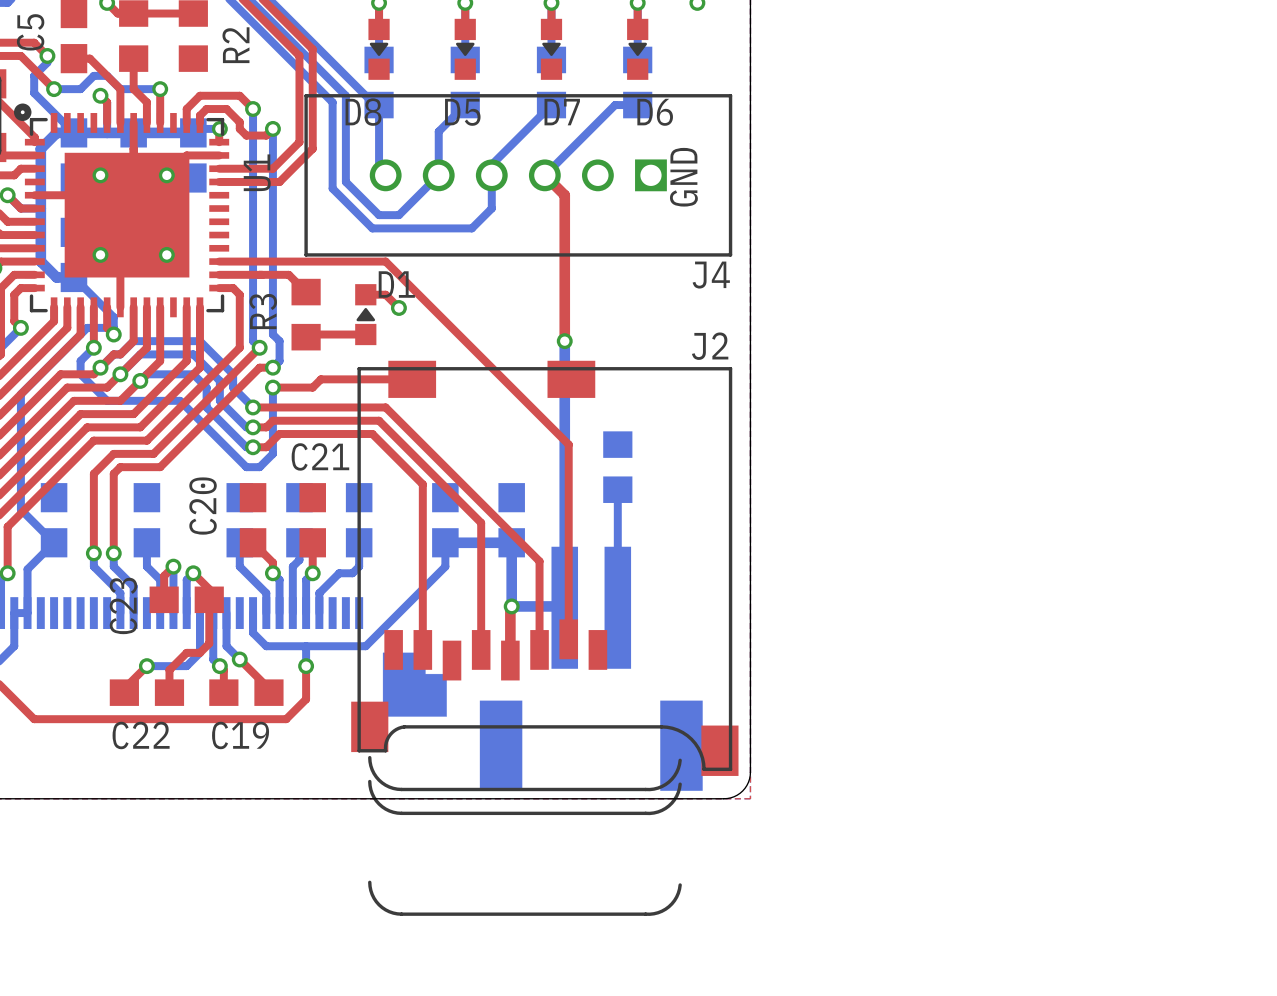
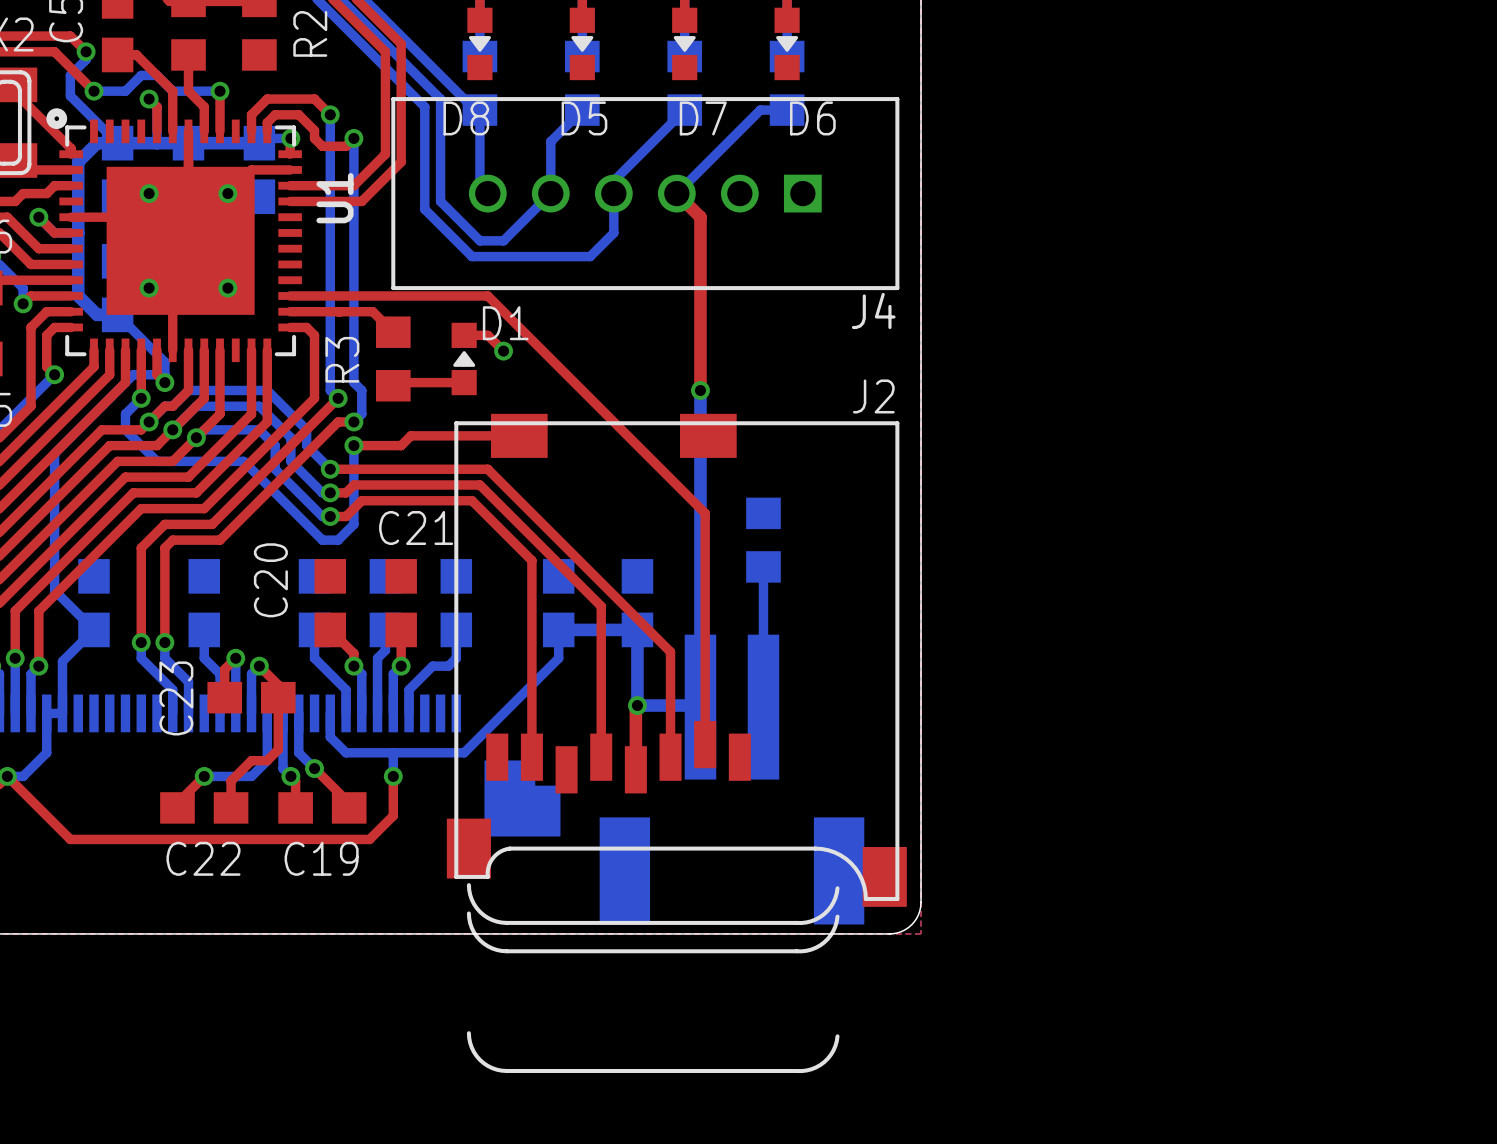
text: GND (683, 177) -> none

